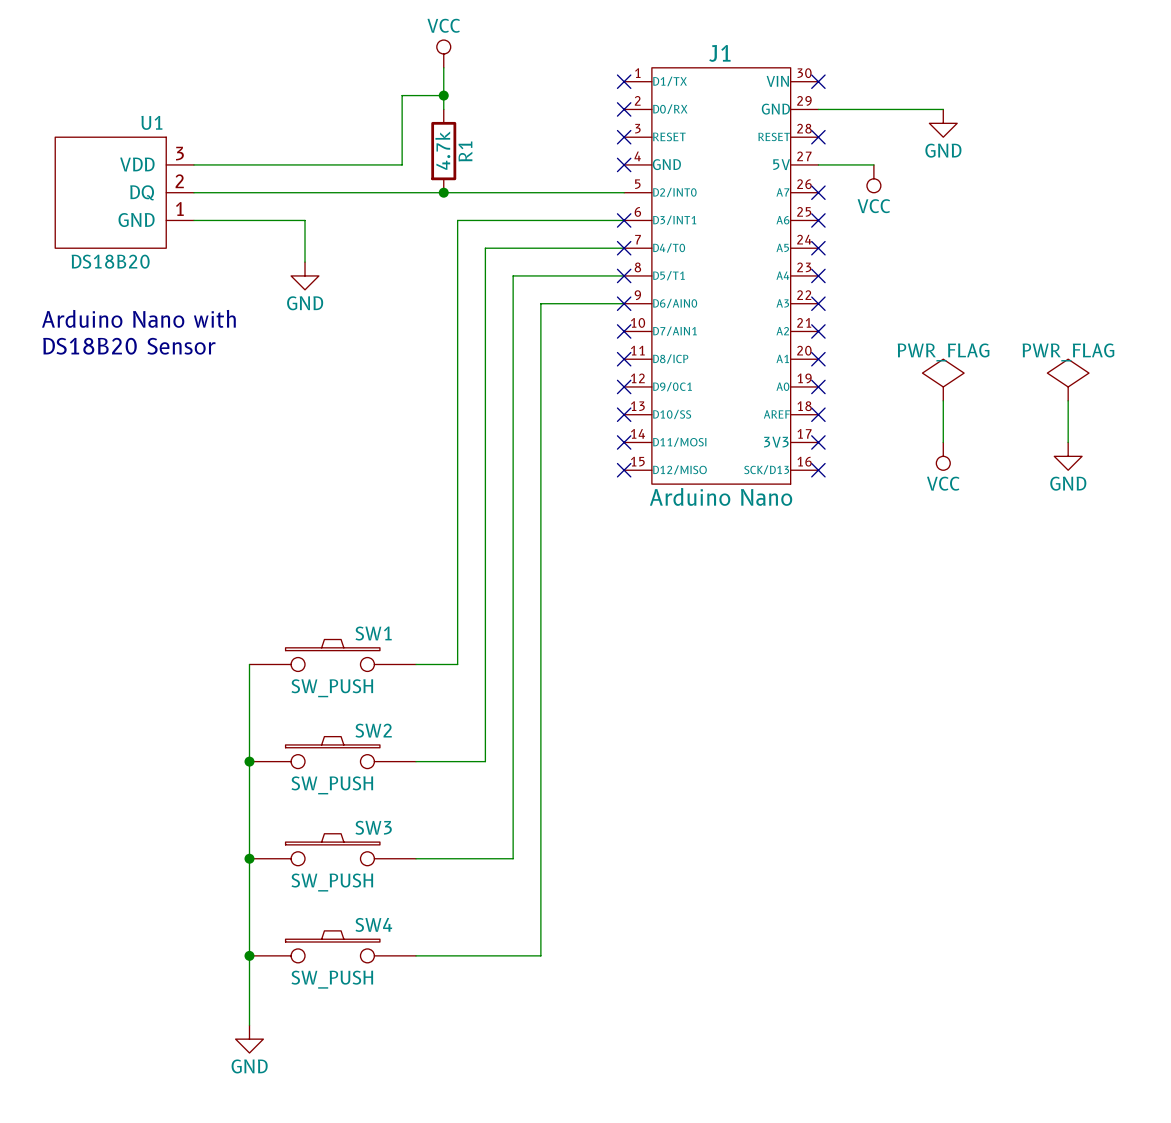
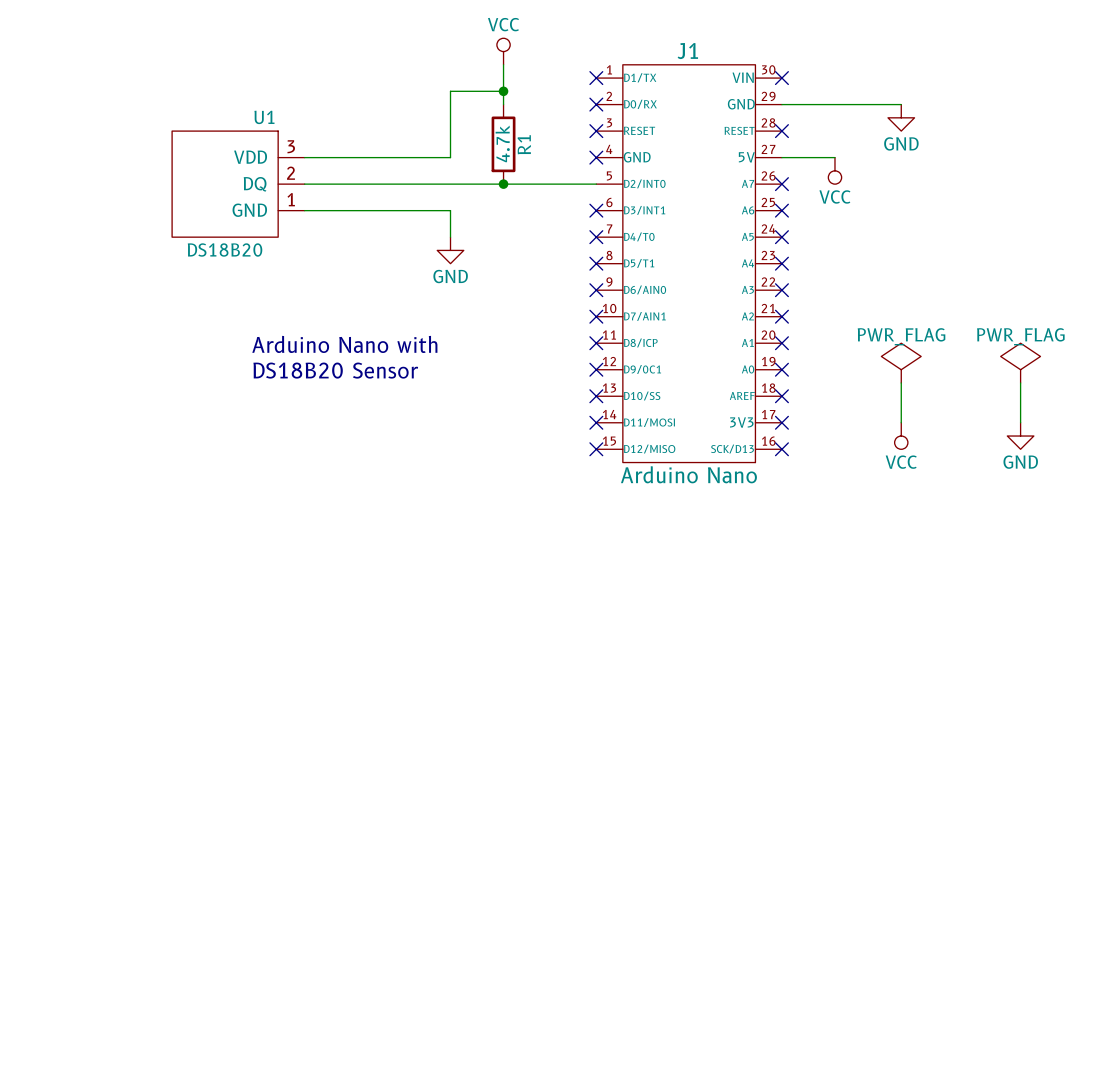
power symbol position: VCC (443, 53) -> VCC (503, 51)
wire: (443, 67) (443, 109) -> (503, 64) (503, 104)
wire: (443, 95) (402, 95) (402, 164) -> (503, 91) (450, 91) (450, 157) (384, 157)
junction: (443, 95) -> none
junction: none -> (503, 91)
R1 position: (443, 151) -> (503, 144)
wire: (193, 164) (318, 164) -> none
U1 position: (124, 192) -> (238, 184)
wire: (193, 192) (318, 192) -> none
junction: (443, 192) -> none
junction: none -> (503, 184)
wire: (193, 220) (305, 220) (305, 262) -> none
wire: (457, 220) (457, 664) (416, 664) -> (437, 210) (304, 210)
wire: (471, 220) (624, 220) -> (450, 210) (450, 237)
wire: (624, 248) (485, 248) (485, 761) (416, 761) -> none
power symbol position: GND (305, 275) -> GND (450, 250)
wire: (624, 275) (513, 275) (513, 858) (416, 858) -> none
wire: (624, 303) (540, 303) (540, 955) (416, 955) -> none
text position: Arduino Nano with (138, 318) -> Arduino Nano with (344, 344)
text position: DS18B20 Sensor (129, 346) -> DS18B20 Sensor (335, 370)
SW1: SW_PUSH (332, 655) -> none
wire: (249, 664) (249, 1025) -> none
SW2: SW_PUSH (332, 752) -> none
junction: (249, 761) -> none
SW3: SW_PUSH (332, 849) -> none
junction: (249, 858) -> none
SW4: SW_PUSH (332, 946) -> none
junction: (249, 955) -> none
power symbol: GND (249, 1039) -> none

